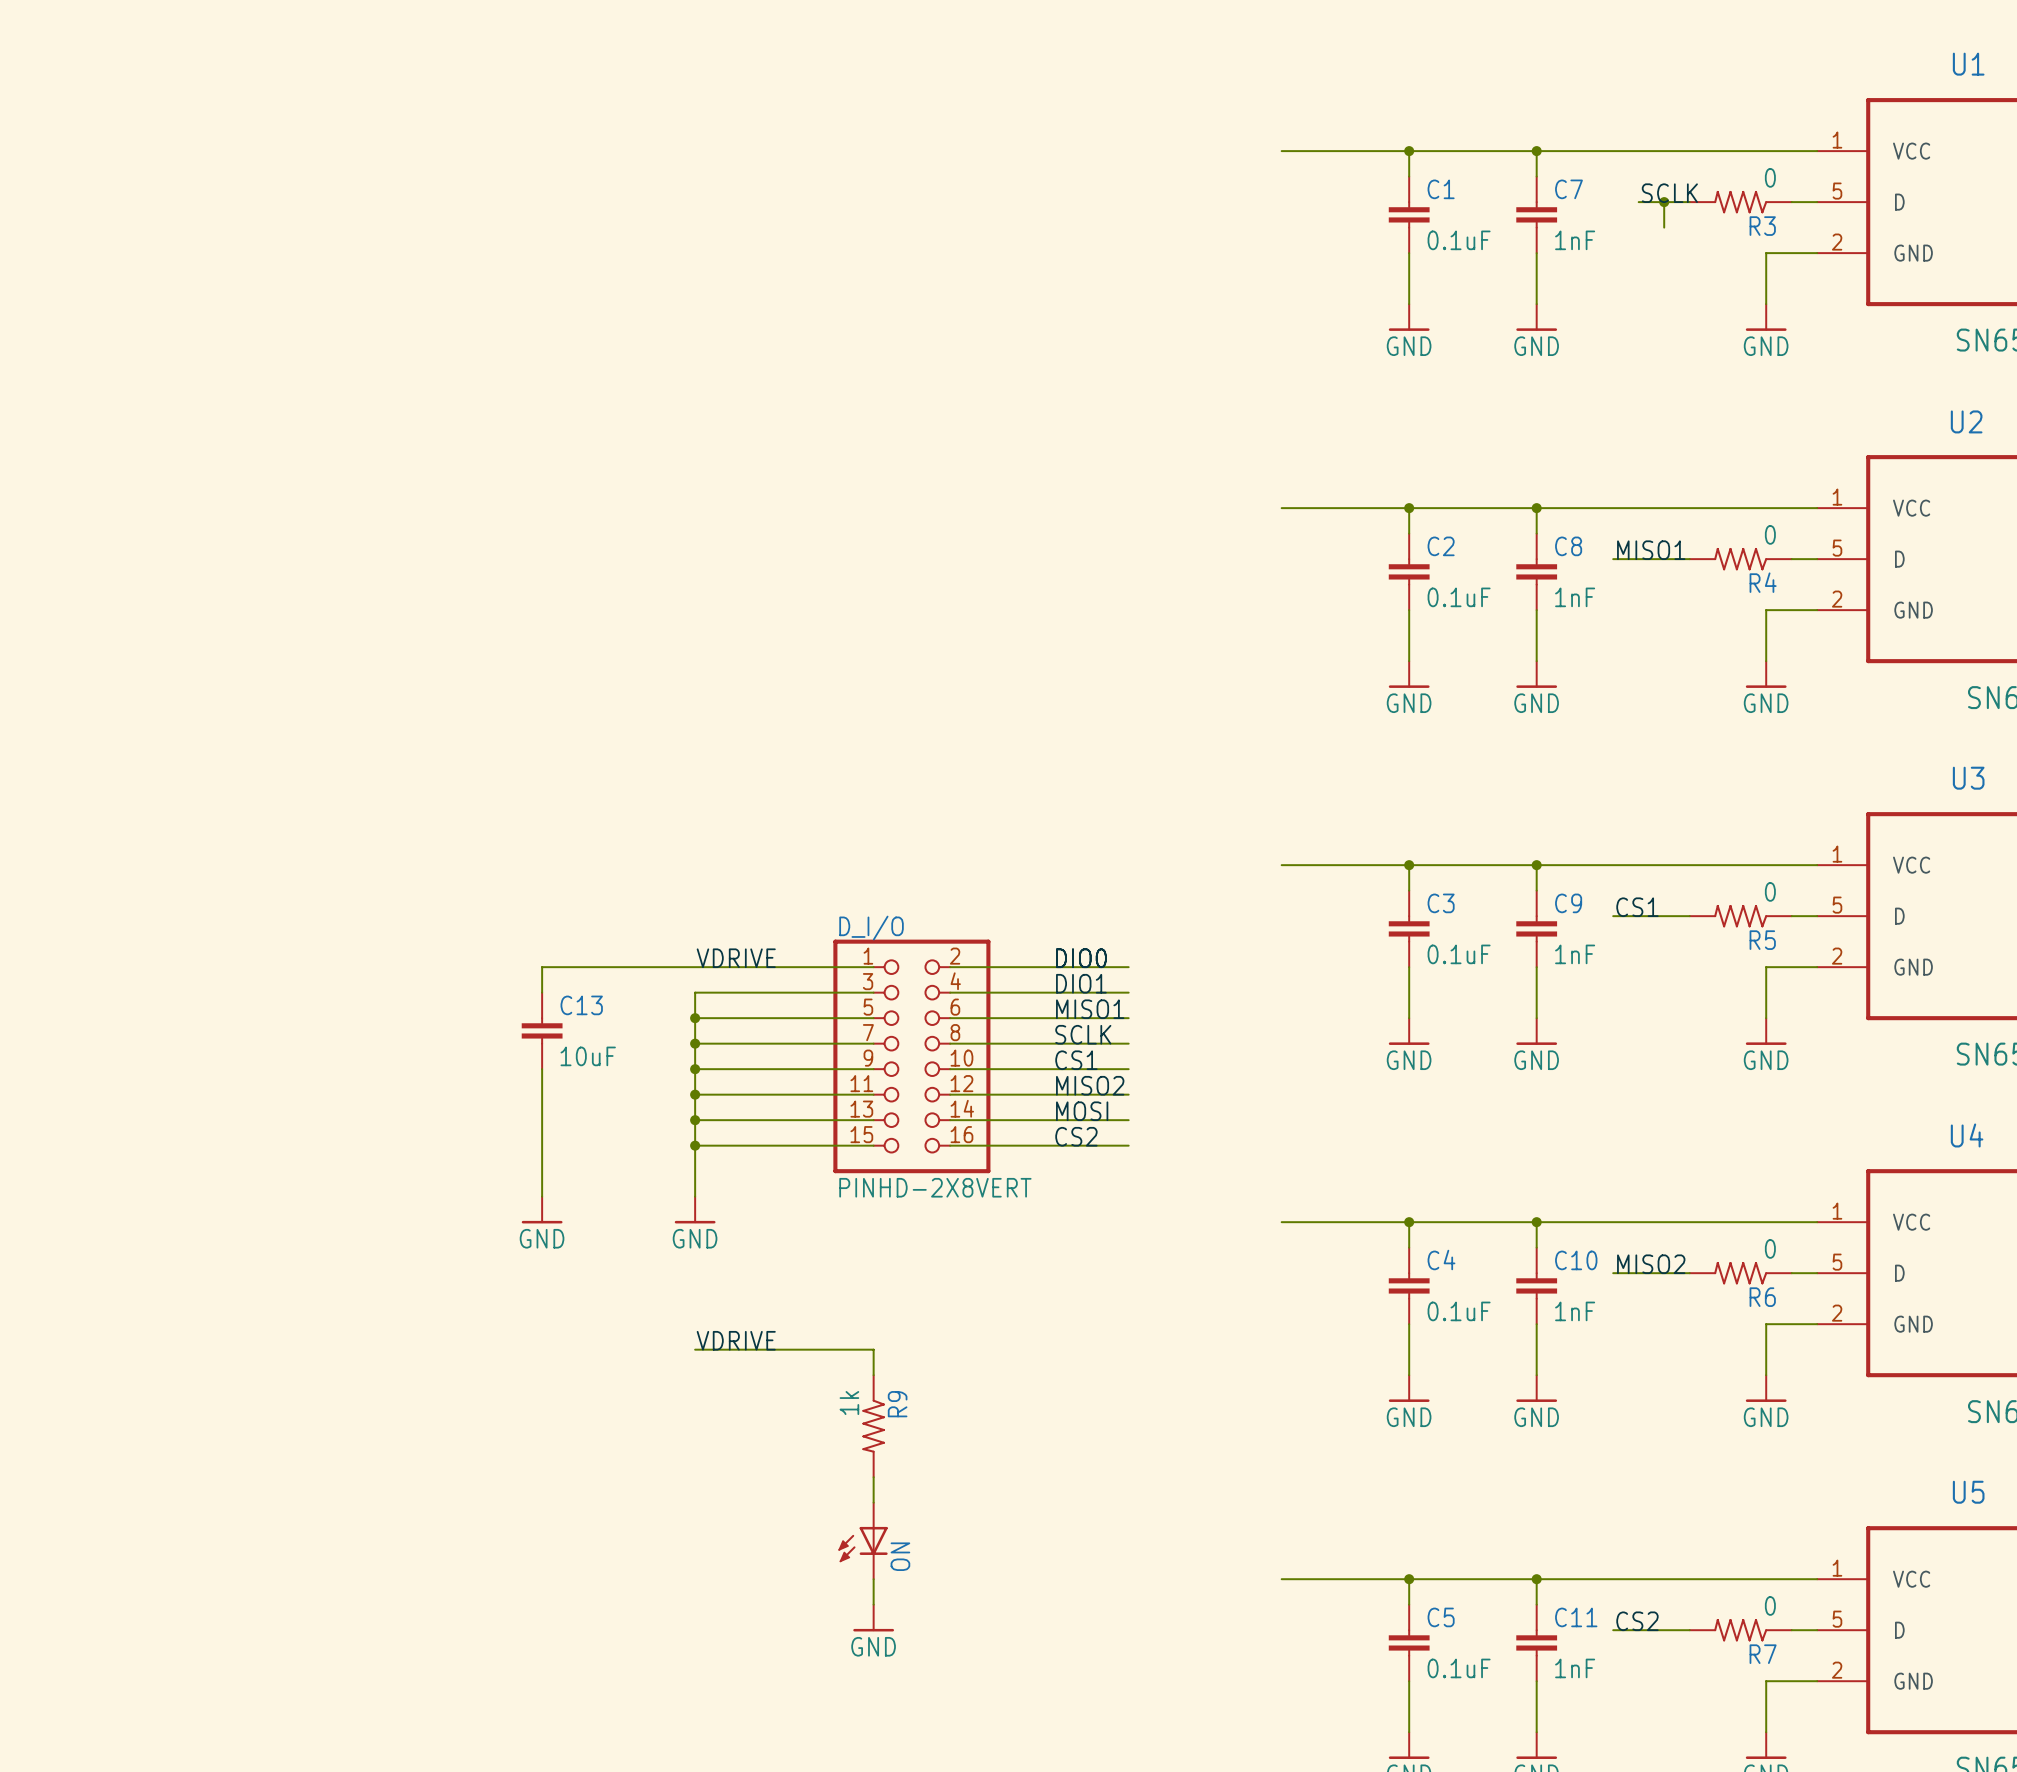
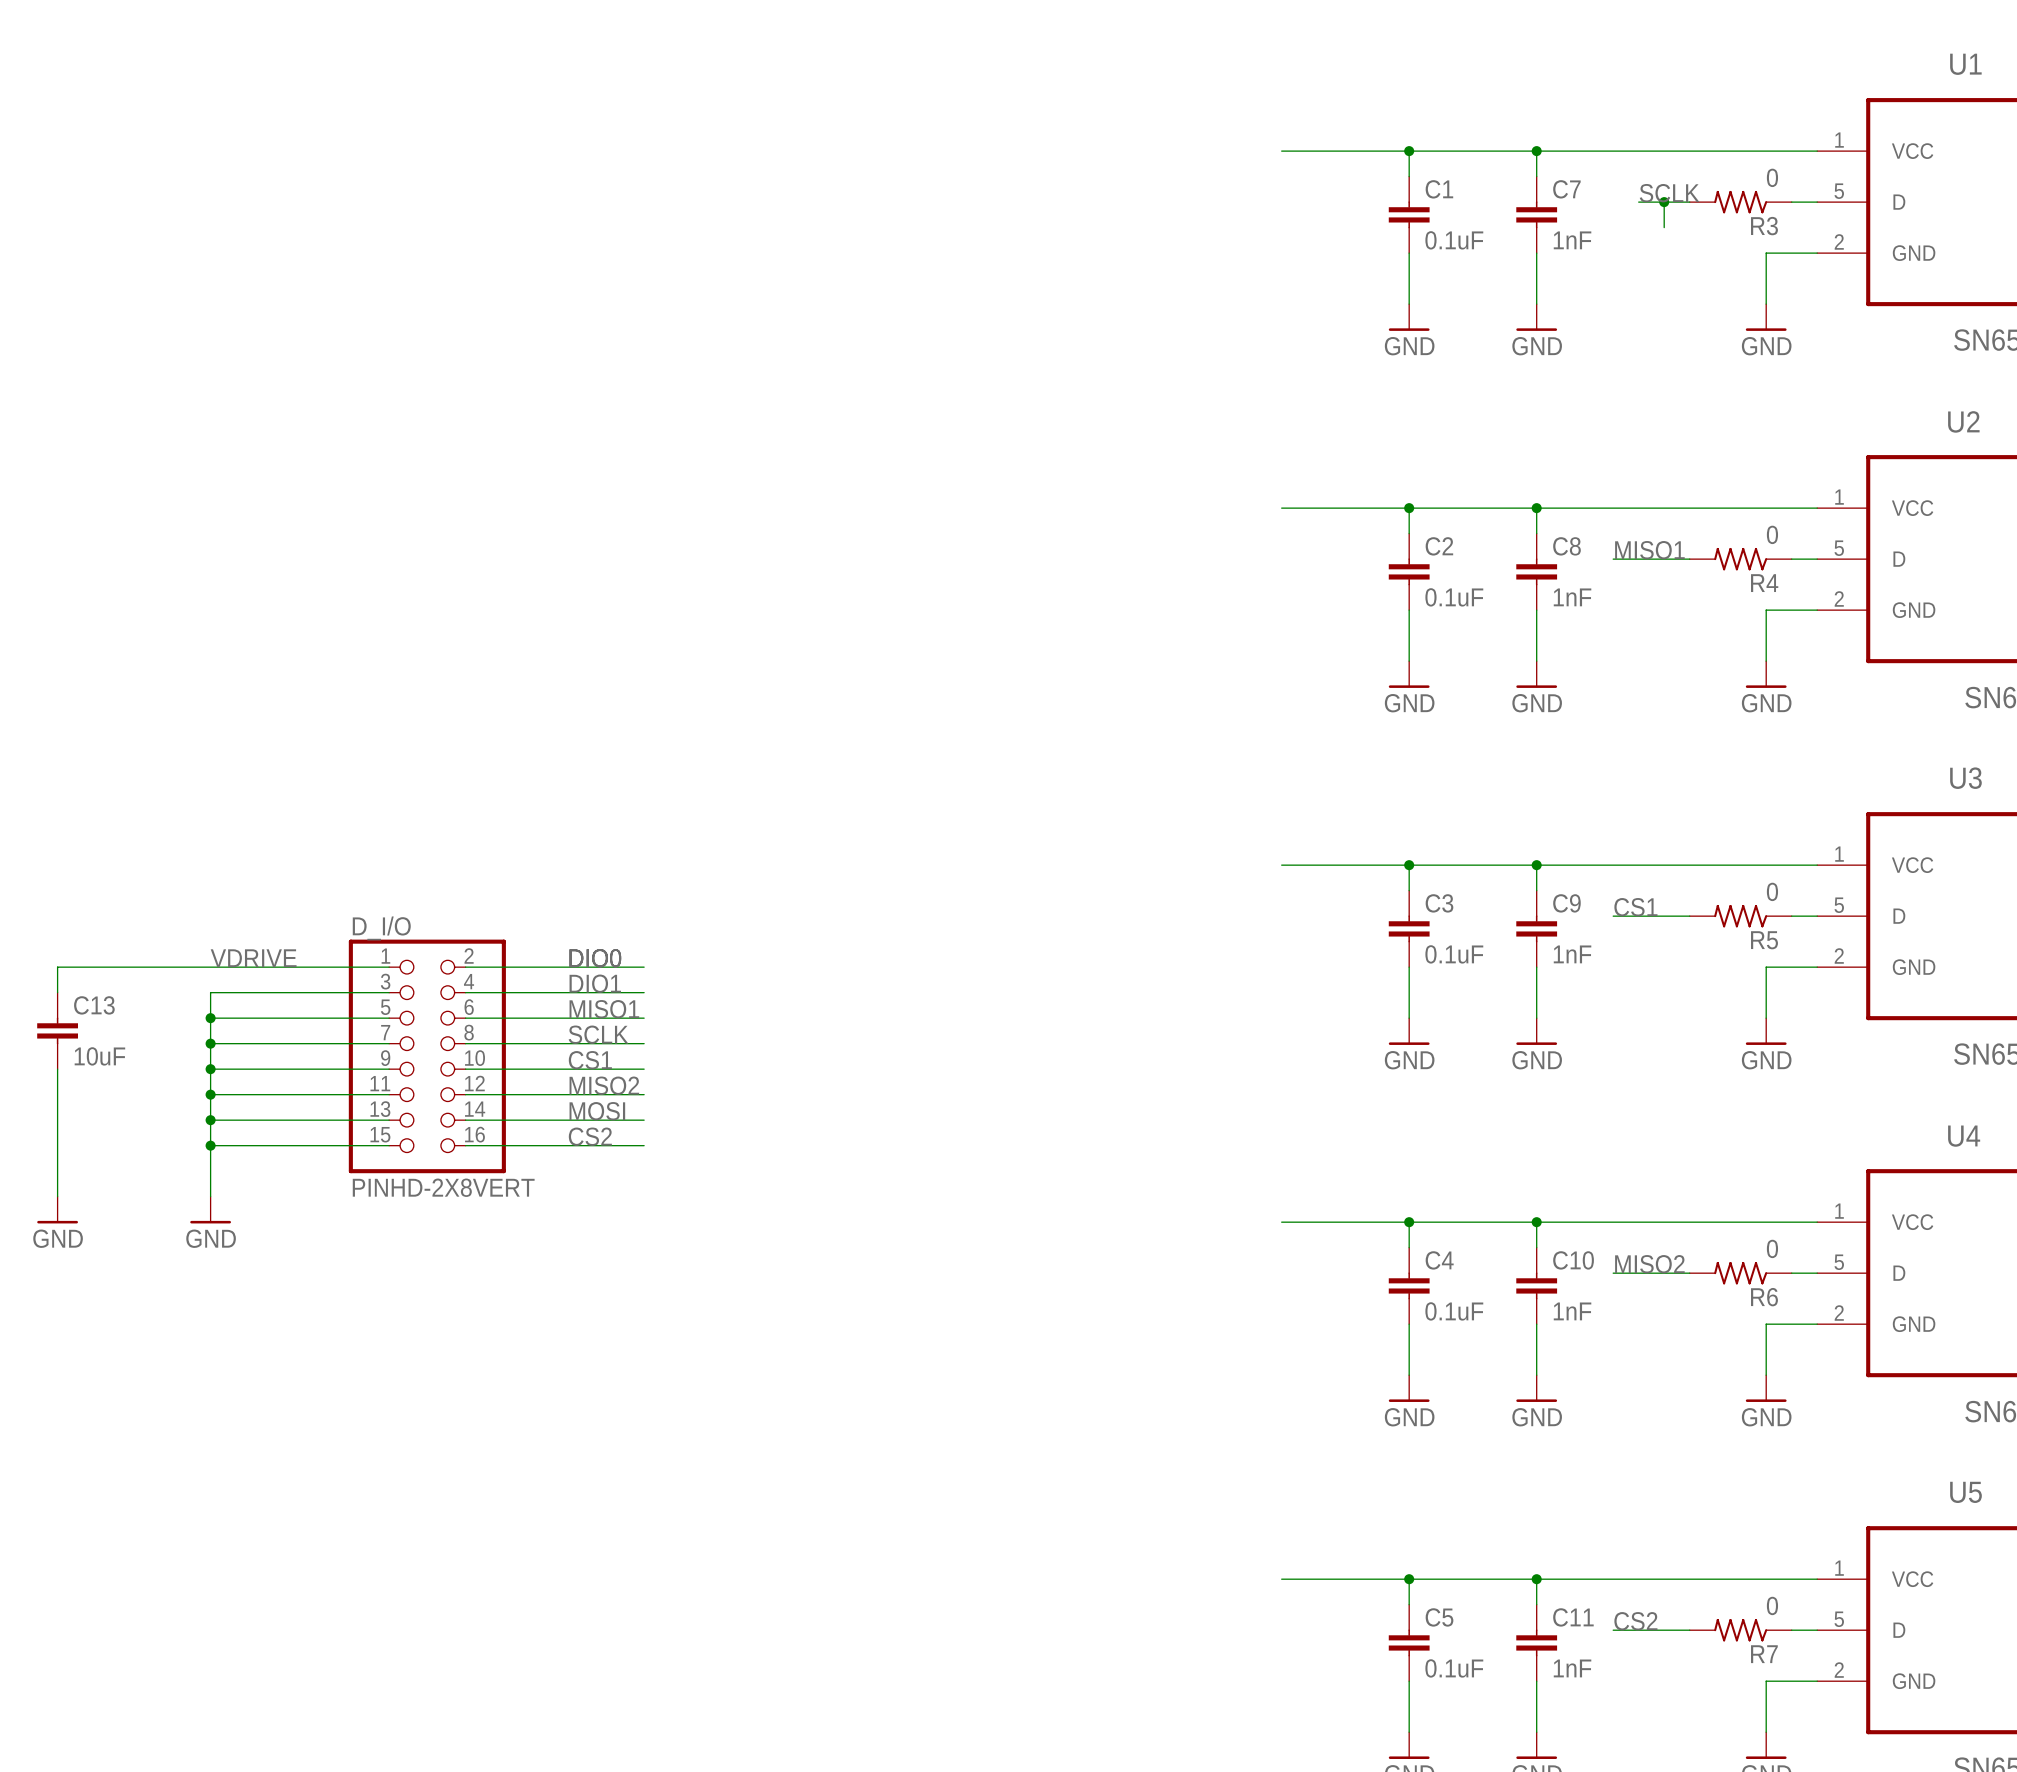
label: none -> VDRIVE (253, 958)
label: none -> DIO0 (595, 958)
label: VDRIVE (736, 958) -> none
label: DIO0 (1081, 958) -> none
wire: none -> (389, 967) (57, 967) (57, 992)
wire: (542, 967) (542, 992) -> (542, 967) (465, 967)
wire: (644, 967) (873, 967) -> none
wire: (950, 967) (1128, 967) -> none
label: none -> DIO1 (595, 983)
label: DIO1 (1081, 983) -> none
wire: none -> (389, 992) (210, 992) (210, 1196)
wire: none -> (465, 992) (644, 992)
wire: (873, 992) (695, 992) (695, 1196) -> none
wire: (950, 992) (1128, 992) -> none
label: none -> MISO1 (604, 1009)
label: MISO1 (1090, 1009) -> none
wire: none -> (210, 1018) (389, 1018)
junction: none -> (210, 1018)
wire: (695, 1018) (873, 1018) -> (465, 1018) (644, 1018)
junction: (695, 1018) -> none
wire: (950, 1018) (1128, 1018) -> none
C13 position: (542, 1030) -> (57, 1030)
label: none -> SCLK (598, 1034)
label: SCLK (1083, 1034) -> none
wire: none -> (210, 1043) (389, 1043)
junction: none -> (210, 1043)
wire: (695, 1043) (873, 1043) -> (465, 1043) (644, 1043)
junction: (695, 1043) -> none
wire: (950, 1043) (1128, 1043) -> none
D_I/O: none -> PINHD-2X8VERT (427, 1056)
D_I/O: PINHD-2X8VERT (911, 1056) -> none
label: none -> CS1 (590, 1060)
label: CS1 (1076, 1060) -> none
wire: none -> (57, 1069) (57, 1196)
wire: none -> (210, 1069) (389, 1069)
junction: none -> (210, 1069)
wire: (542, 1069) (542, 1196) -> none
wire: (695, 1069) (873, 1069) -> (465, 1069) (644, 1069)
junction: (695, 1069) -> none
wire: (950, 1069) (1128, 1069) -> none
label: none -> MISO2 (604, 1085)
label: MISO2 (1090, 1085) -> none
wire: none -> (210, 1094) (389, 1094)
junction: none -> (210, 1094)
wire: (695, 1094) (873, 1094) -> (465, 1094) (644, 1094)
junction: (695, 1094) -> none
wire: (950, 1094) (1128, 1094) -> none
label: none -> MOSI (597, 1111)
label: MOSI (1082, 1111) -> none
wire: none -> (210, 1120) (389, 1120)
junction: none -> (210, 1120)
wire: (695, 1120) (873, 1120) -> (465, 1120) (644, 1120)
junction: (695, 1120) -> none
wire: (950, 1120) (1128, 1120) -> none
label: none -> CS2 (590, 1136)
label: CS2 (1076, 1136) -> none
wire: none -> (210, 1145) (389, 1145)
junction: none -> (210, 1145)
wire: (695, 1145) (873, 1145) -> (465, 1145) (644, 1145)
junction: (695, 1145) -> none
wire: (950, 1145) (1128, 1145) -> none
power symbol: none -> GND (57, 1210)
power symbol: none -> GND (210, 1210)
power symbol: GND (542, 1210) -> none
power symbol: GND (695, 1210) -> none
label: VDRIVE (736, 1340) -> none
wire: (695, 1349) (873, 1349) (873, 1375) -> none
R9: 1k (873, 1426) -> none
wire: (873, 1477) (873, 1502) -> none
ON: (863, 1540) -> none
wire: (873, 1579) (873, 1604) -> none
power symbol: GND (873, 1618) -> none

